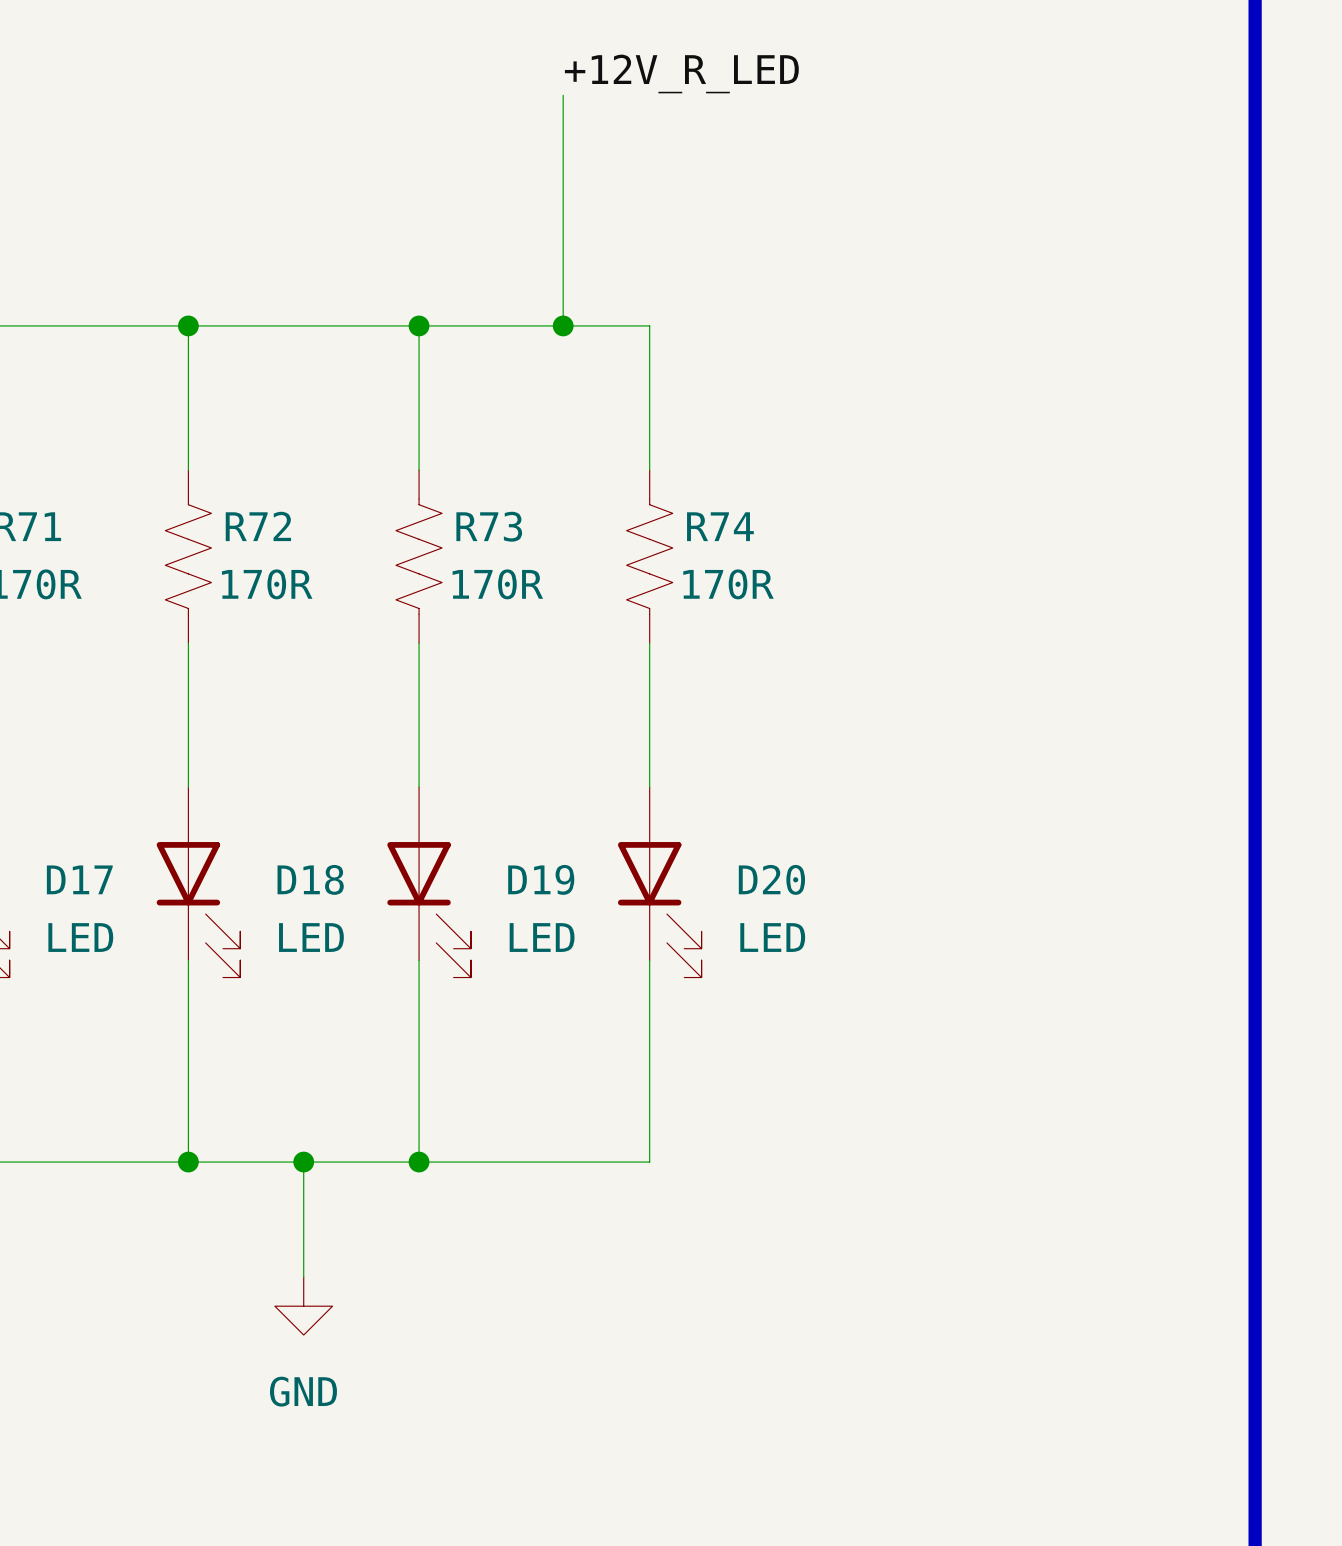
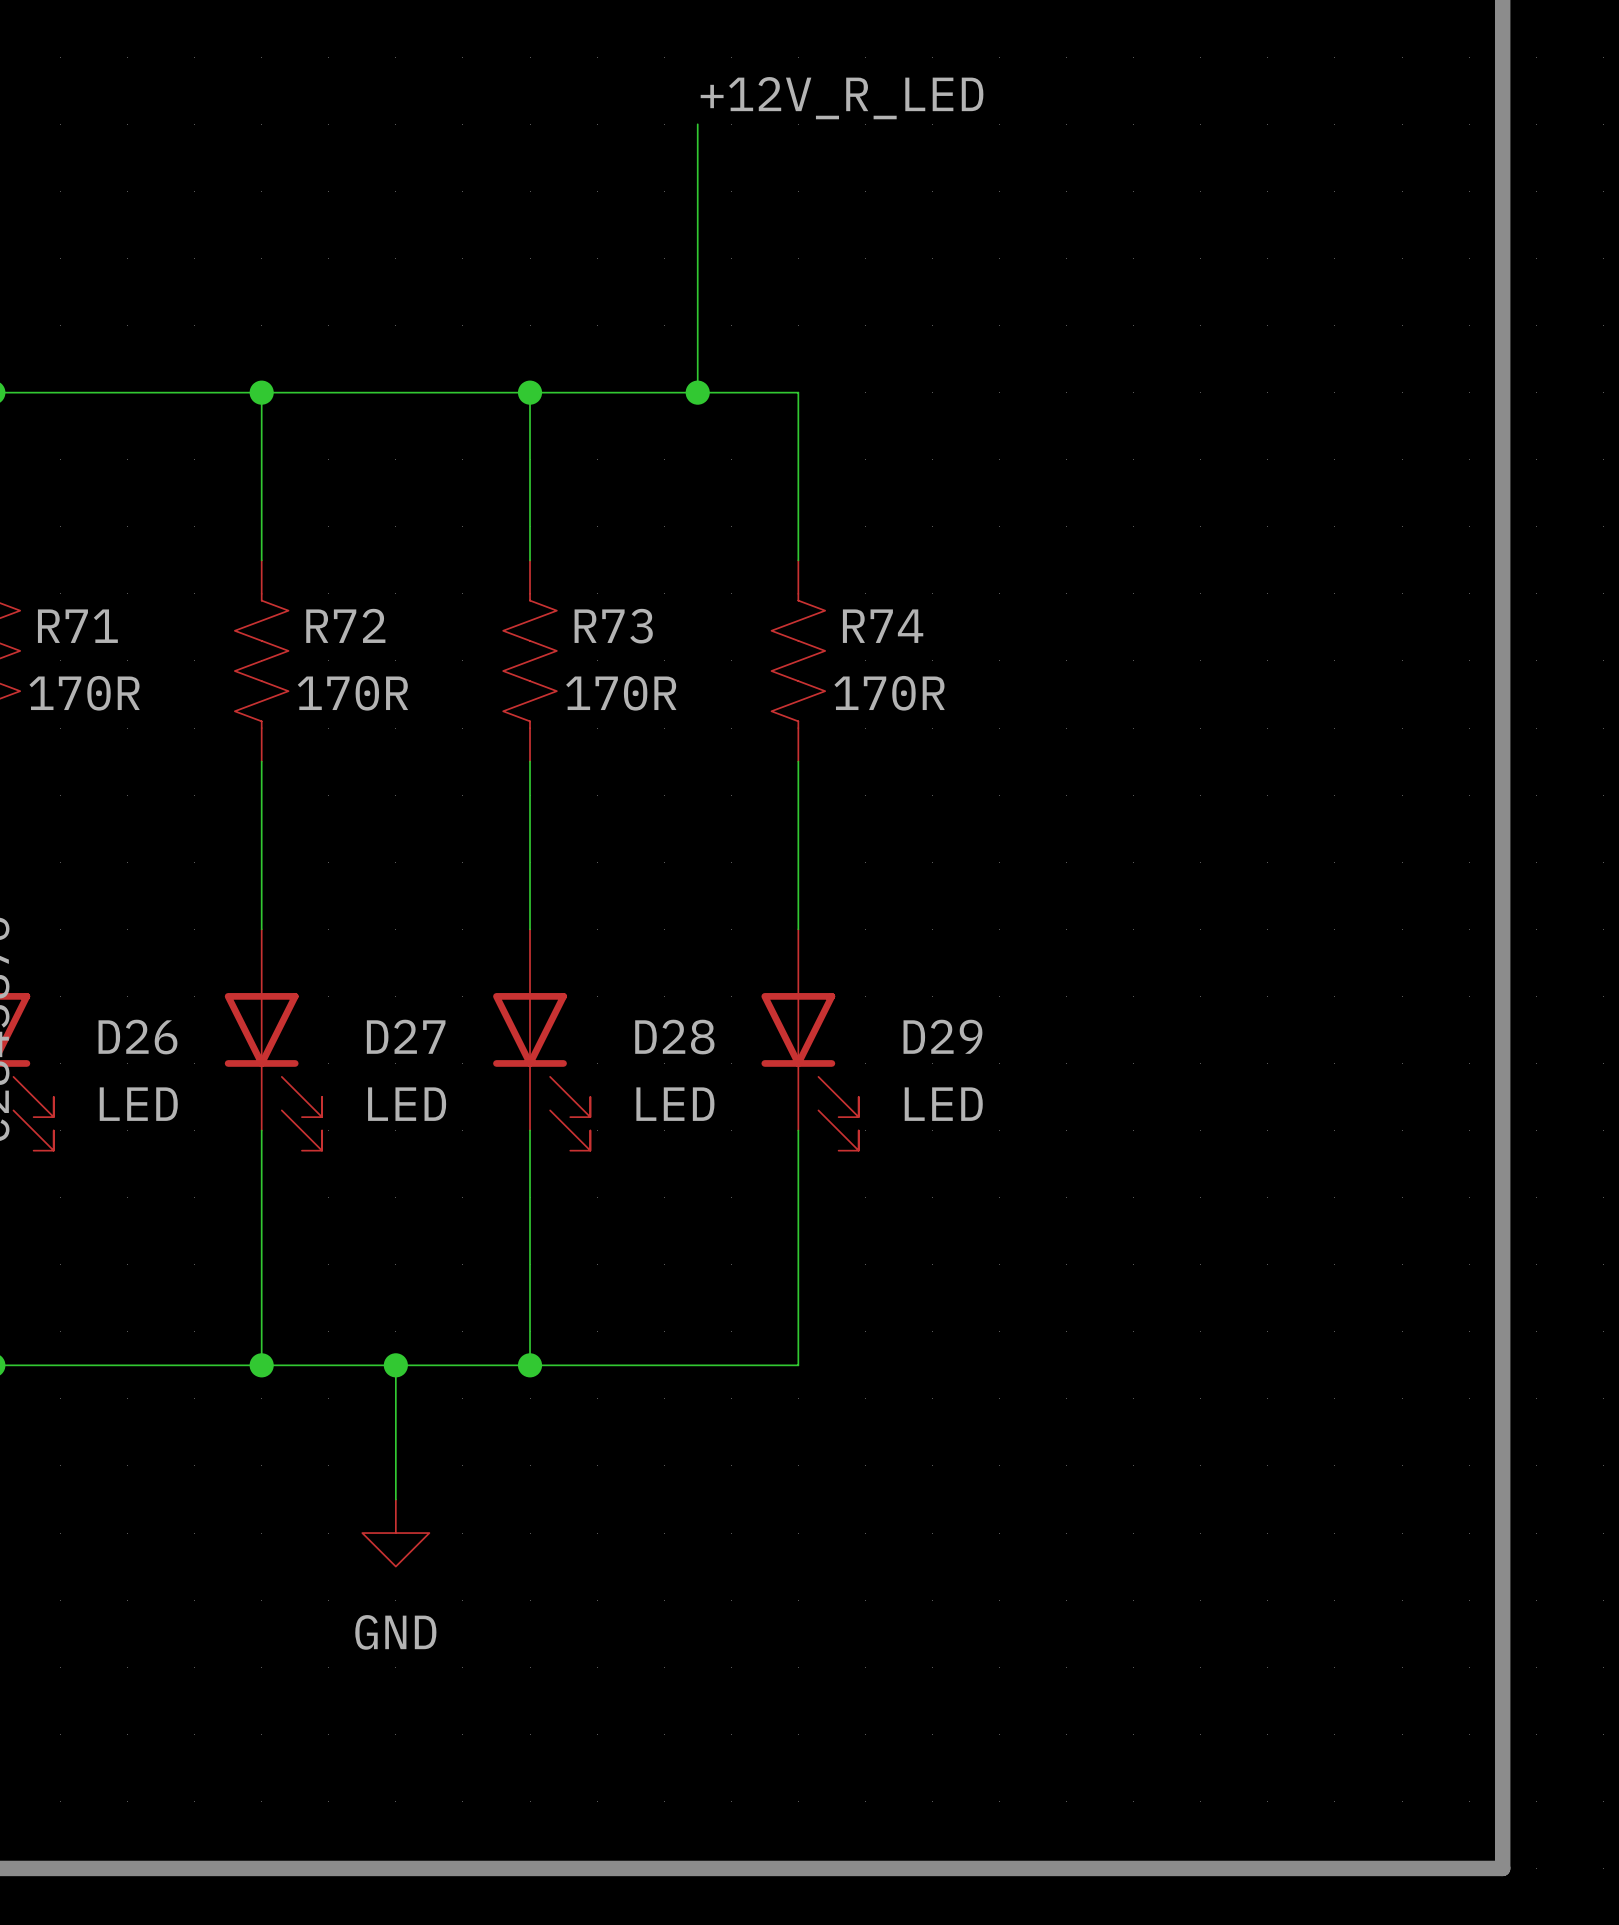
D17 name: D17 (79, 879) -> D26 (137, 1037)
D18 name: D18 (310, 879) -> D27 (406, 1036)
D19 name: D19 (541, 879) -> D28 (674, 1037)
D20 name: D20 (771, 879) -> D29 (942, 1036)

